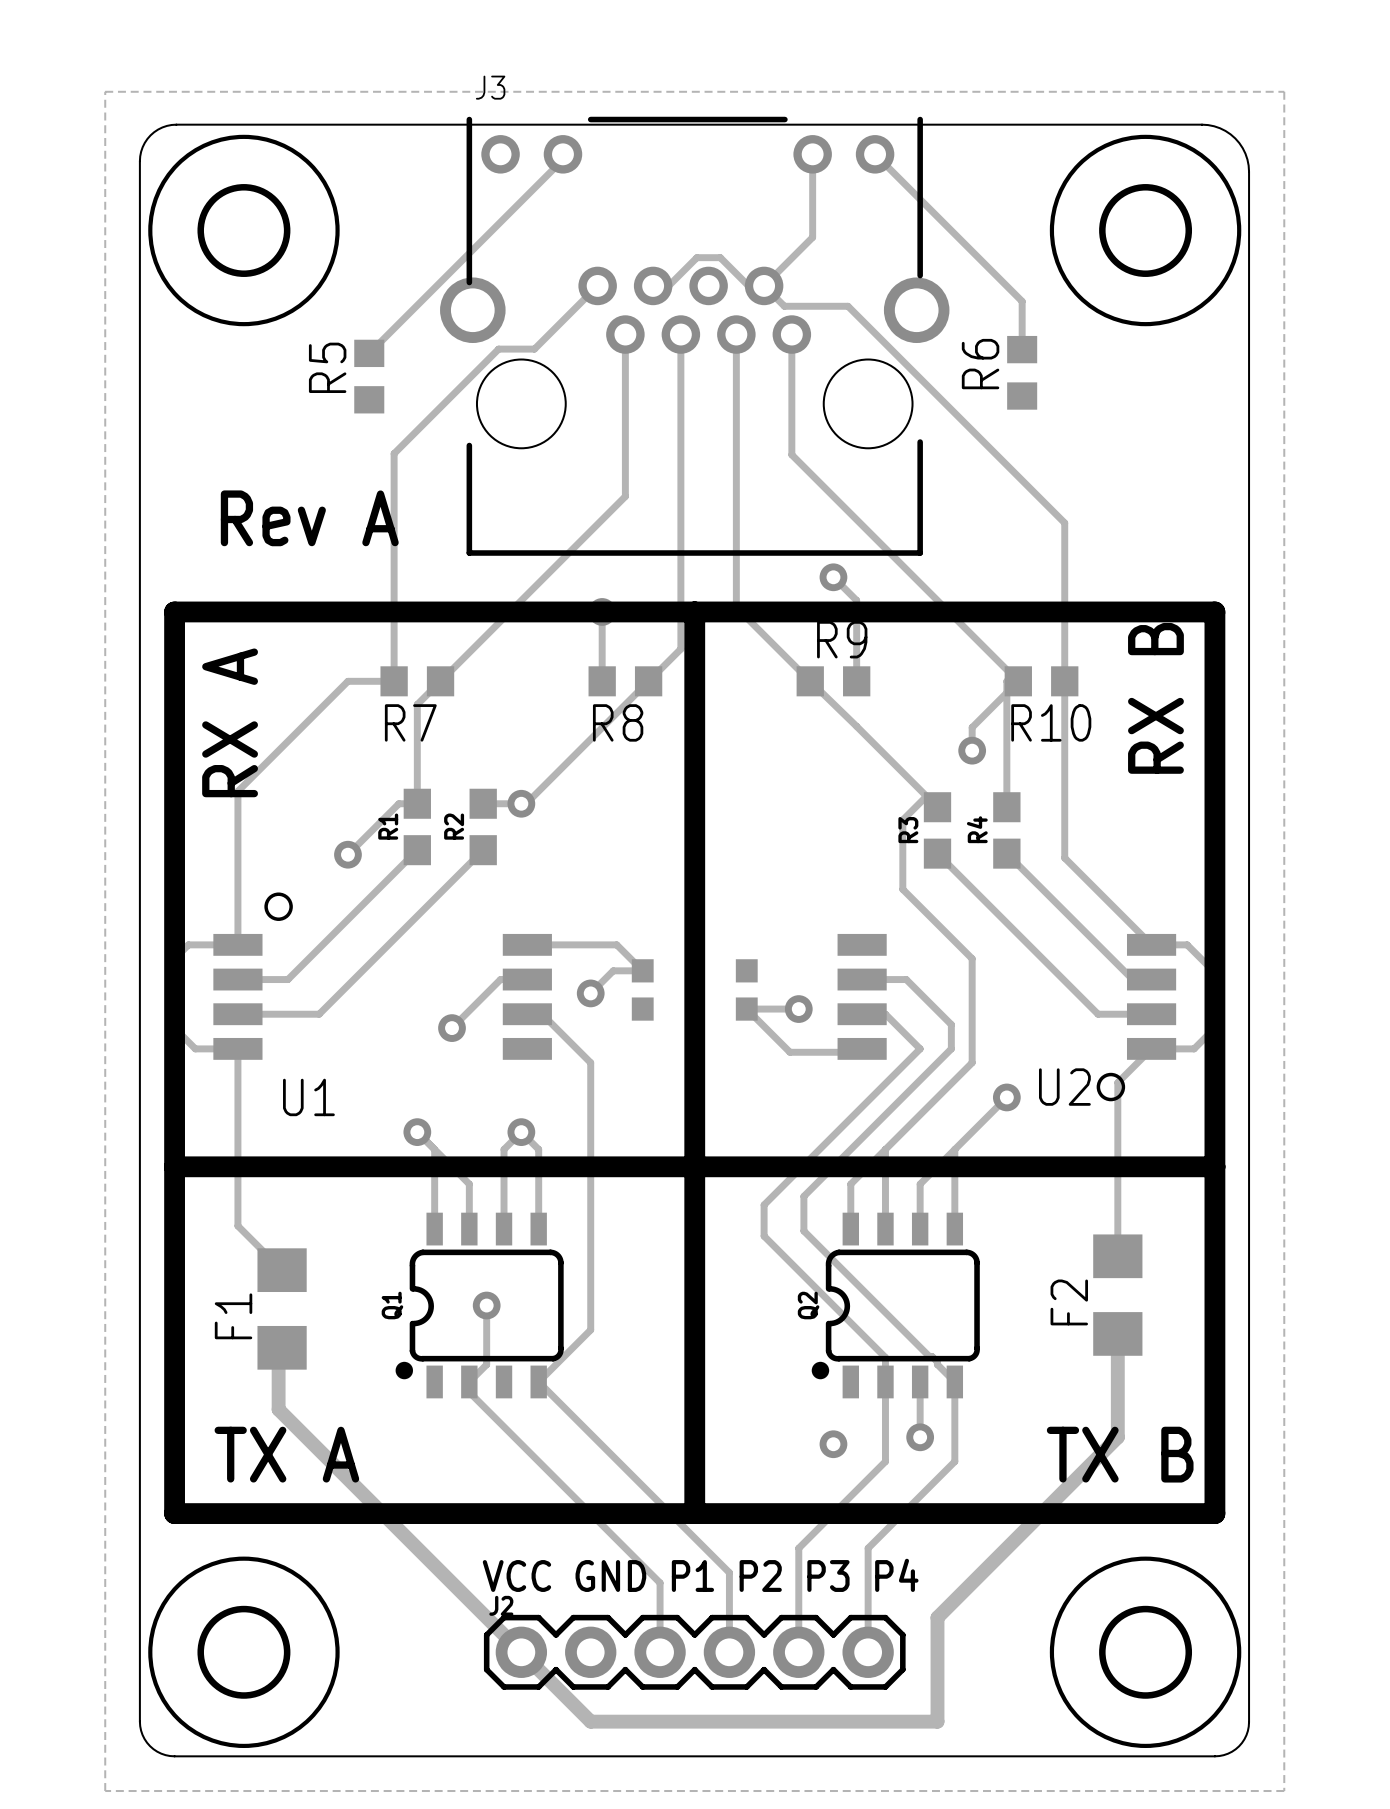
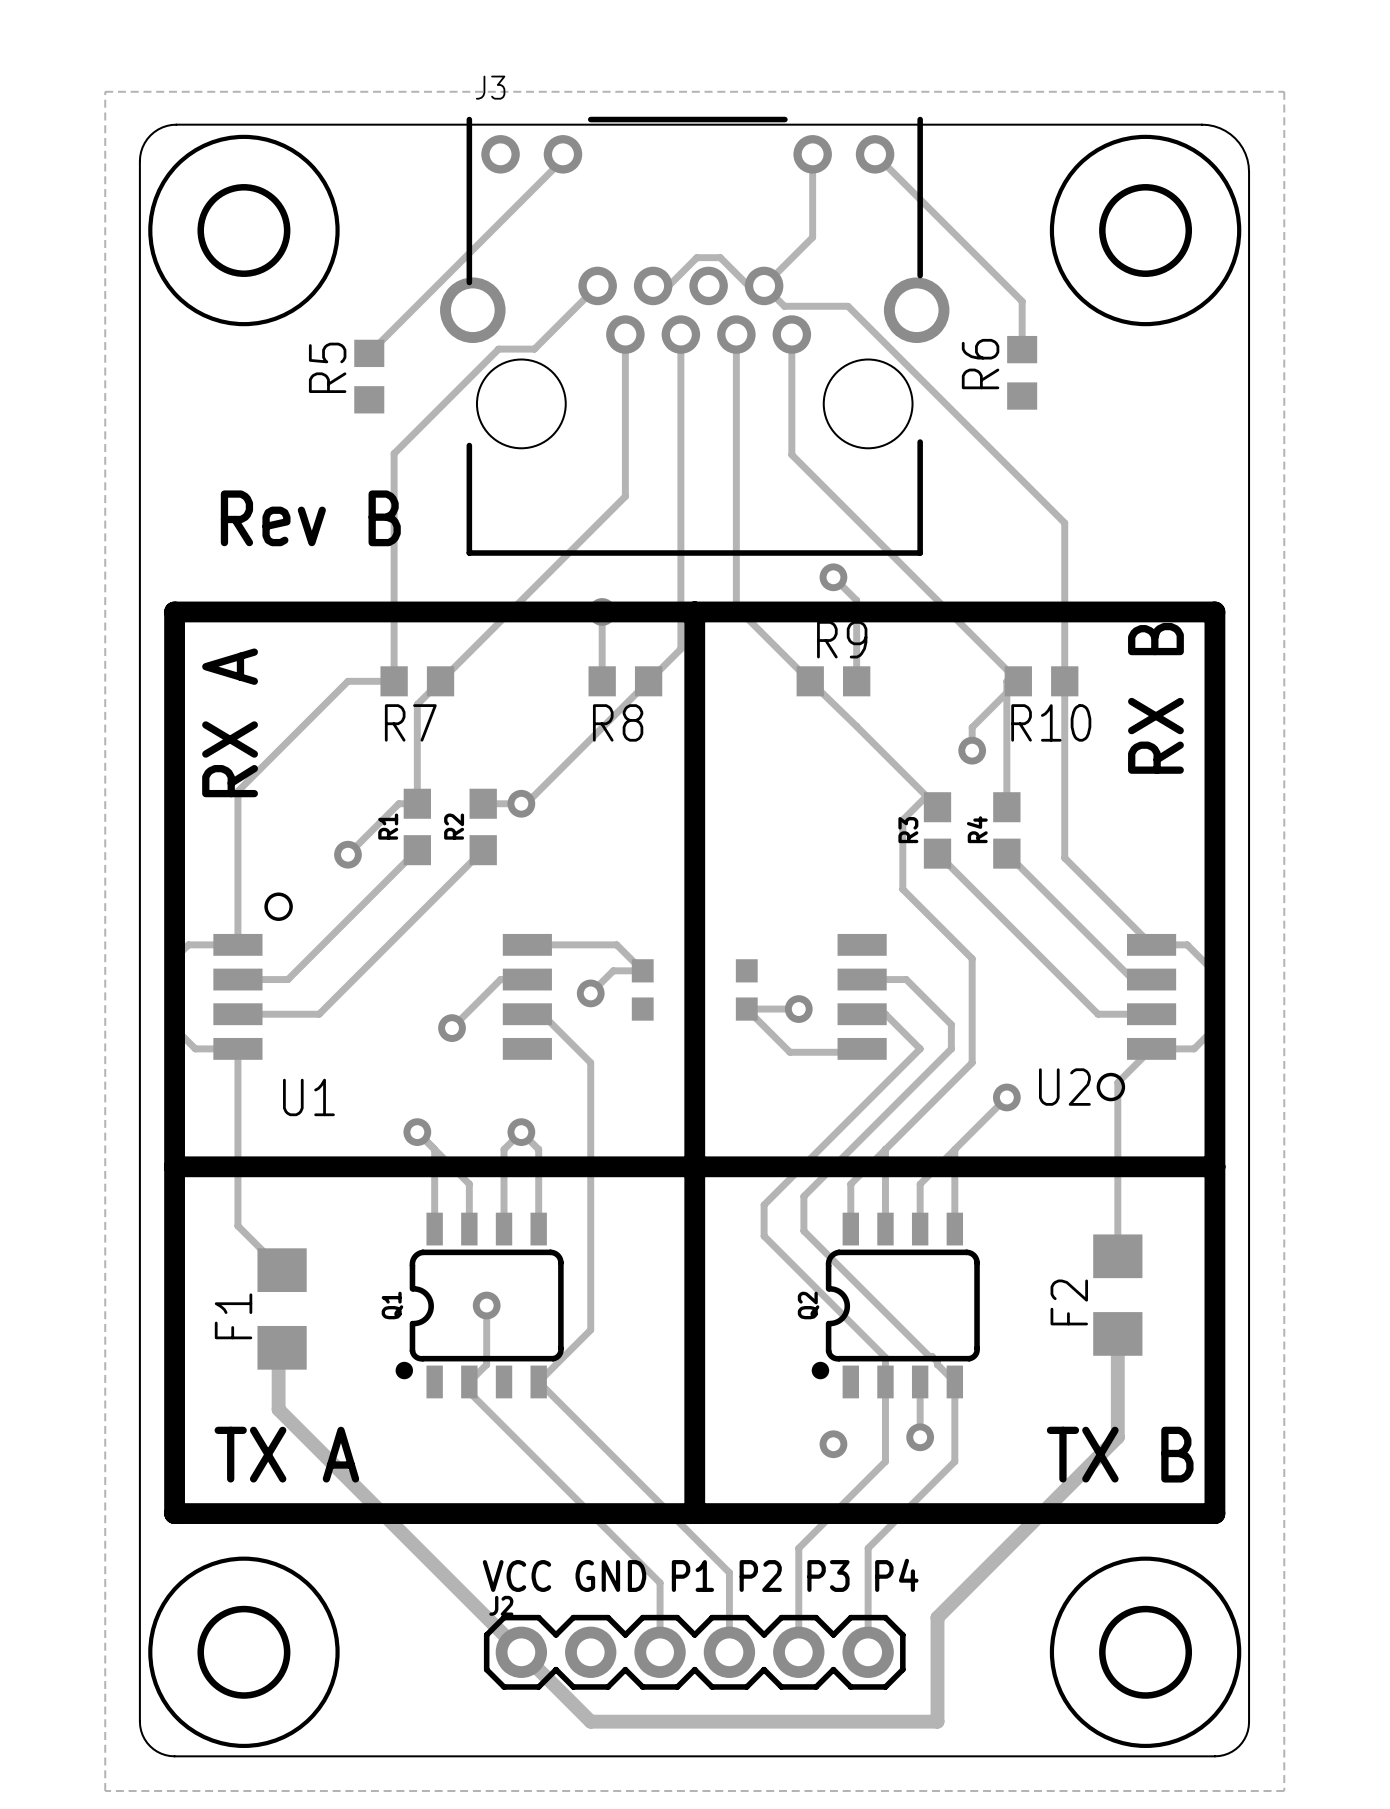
text: Rev A (309, 518) -> Rev B (310, 518)

